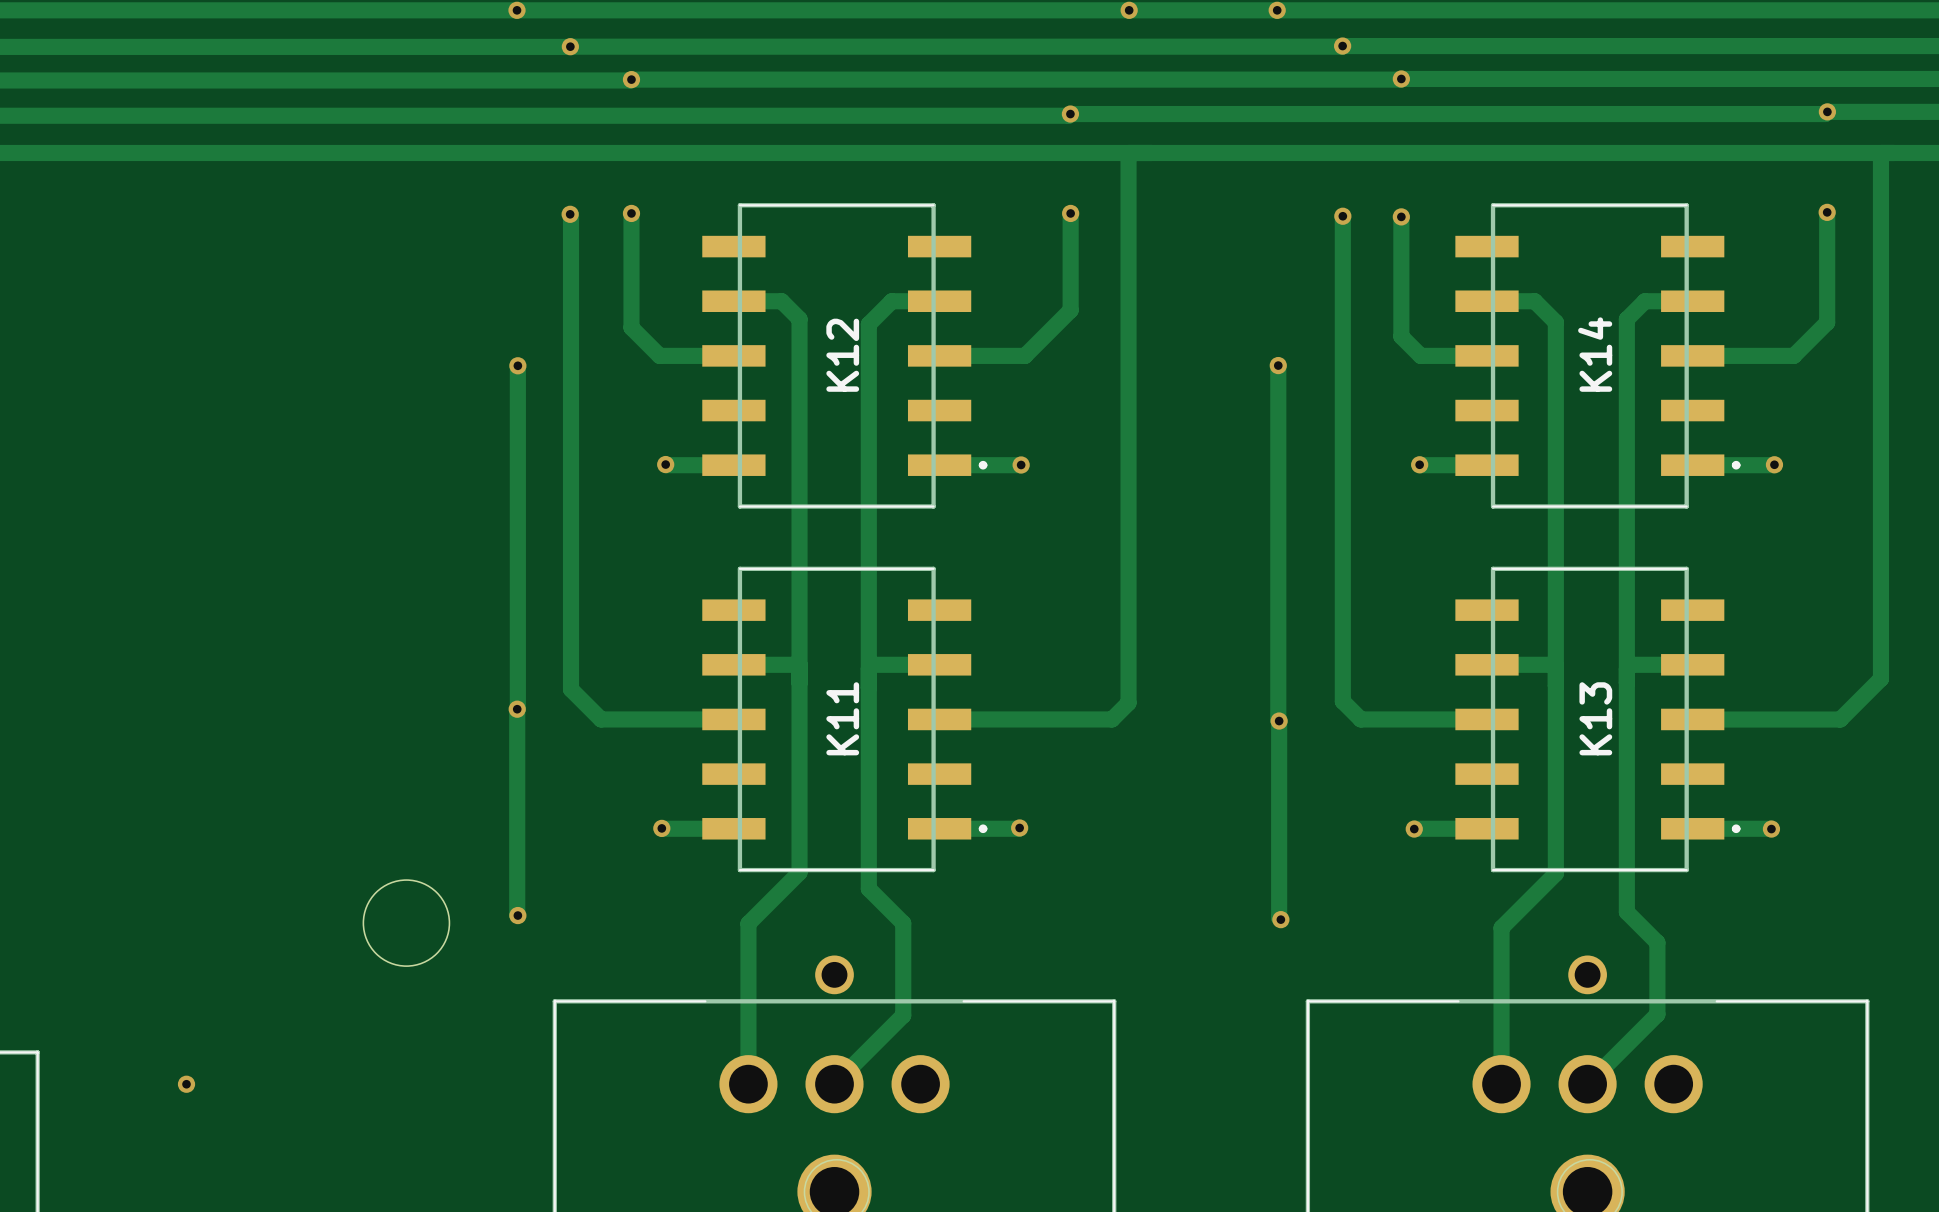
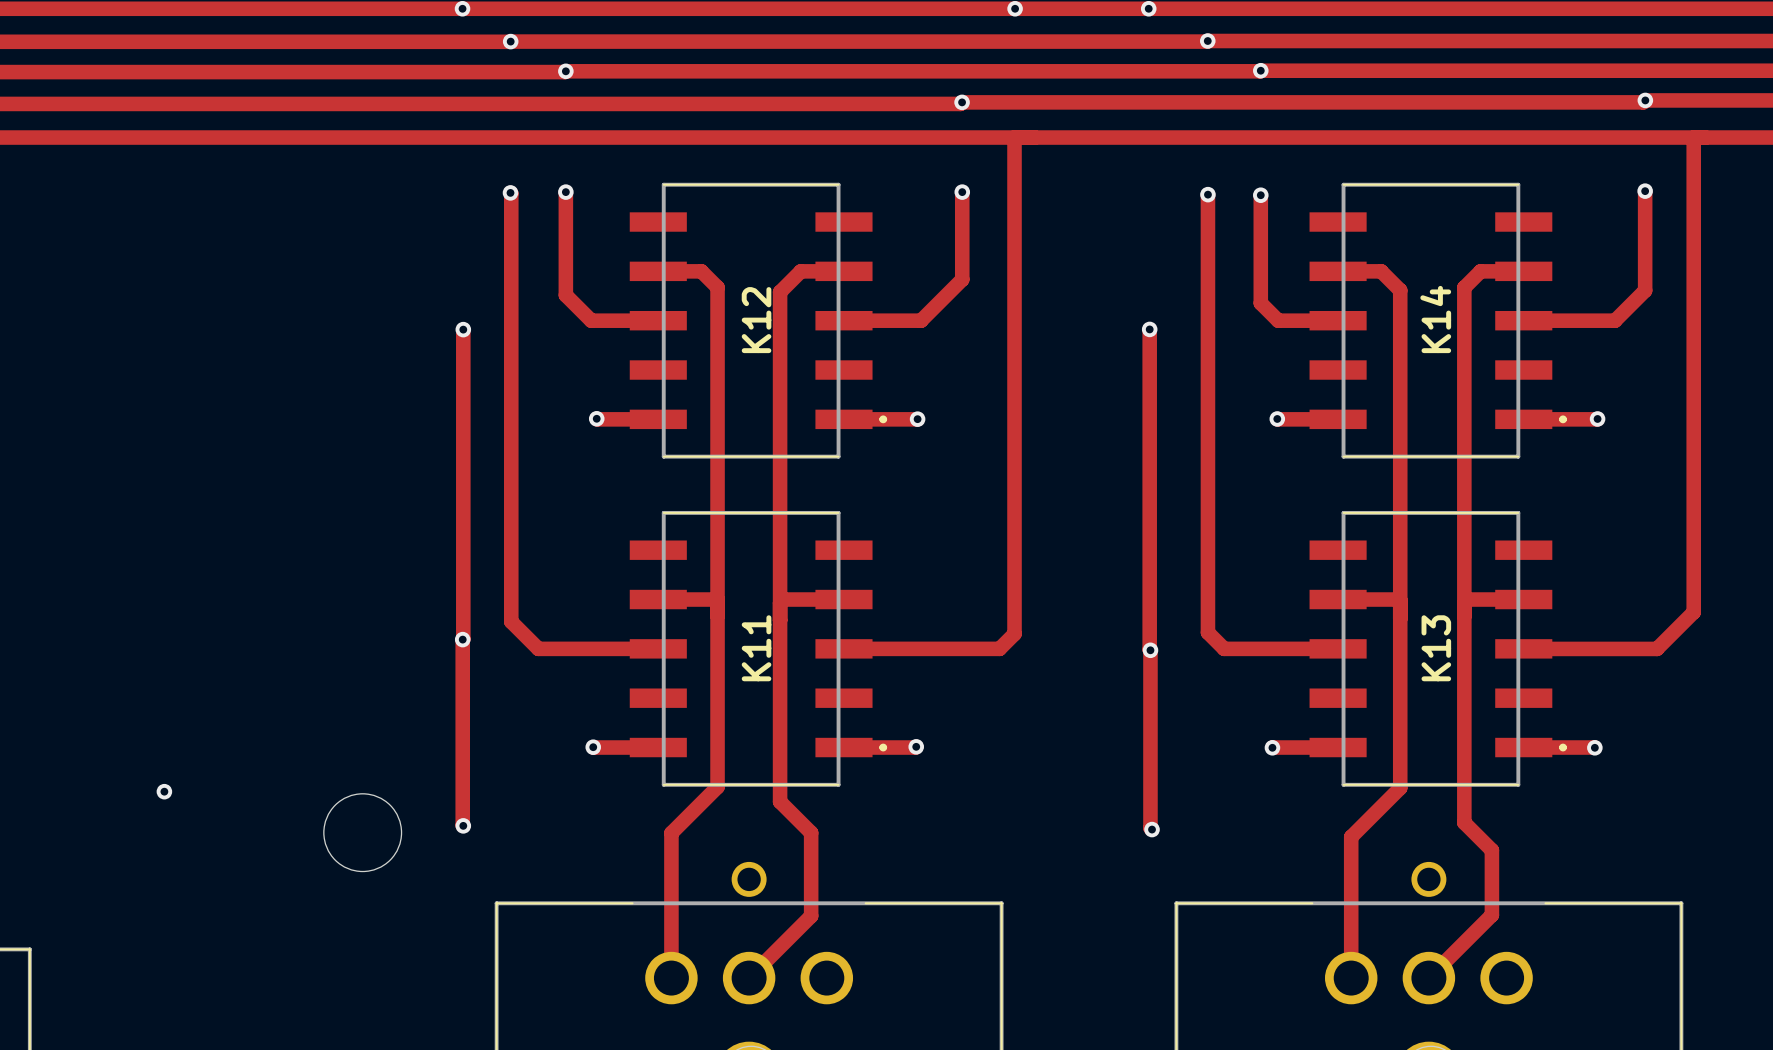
via: none -> (164, 791)
via: (186, 1084) -> none

